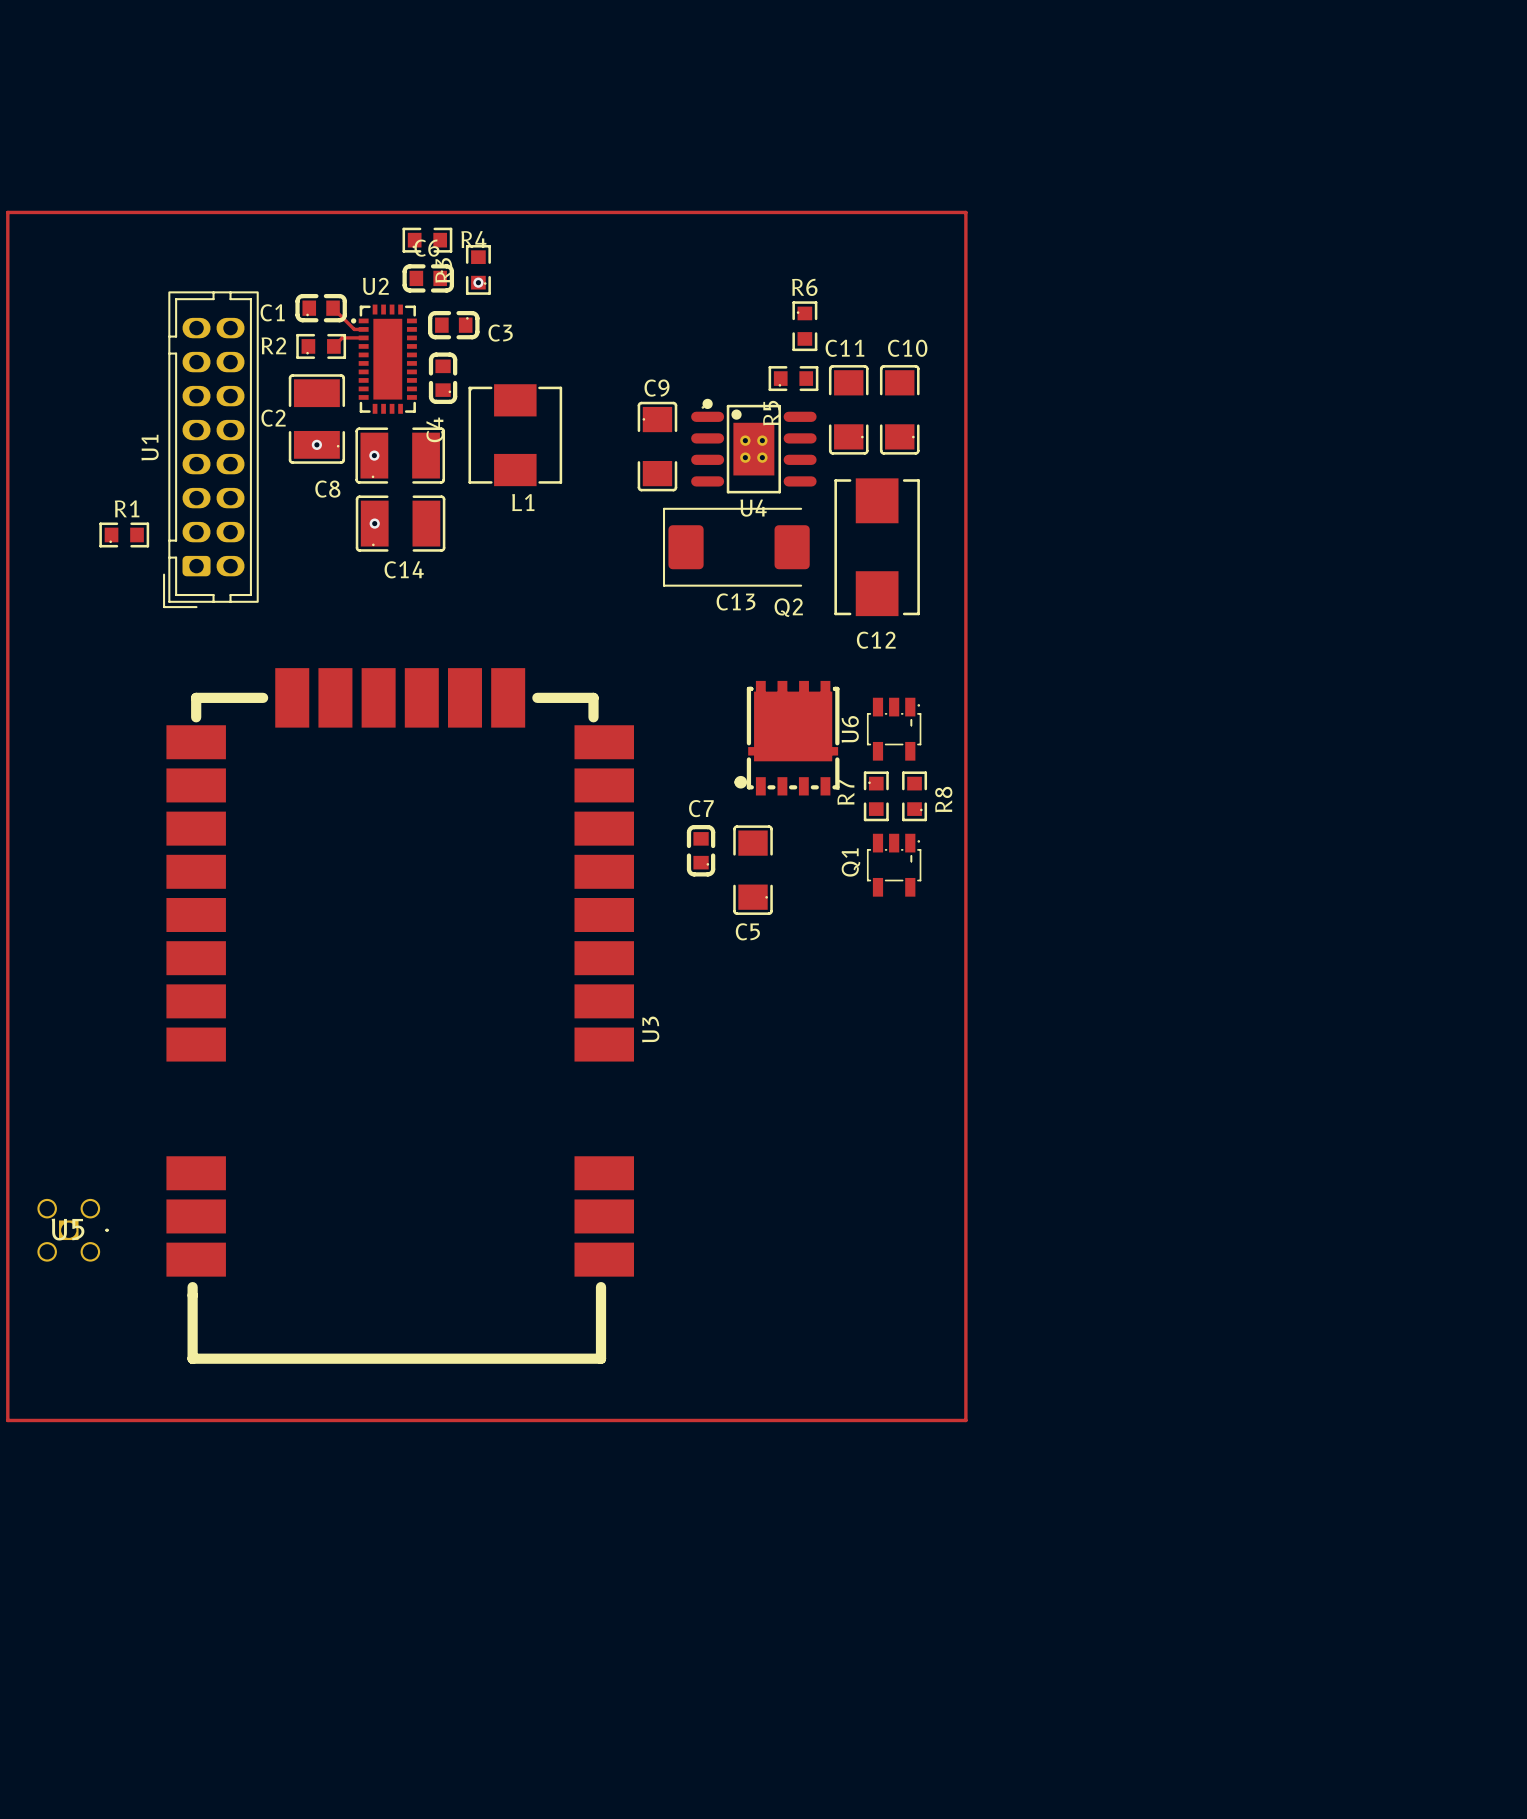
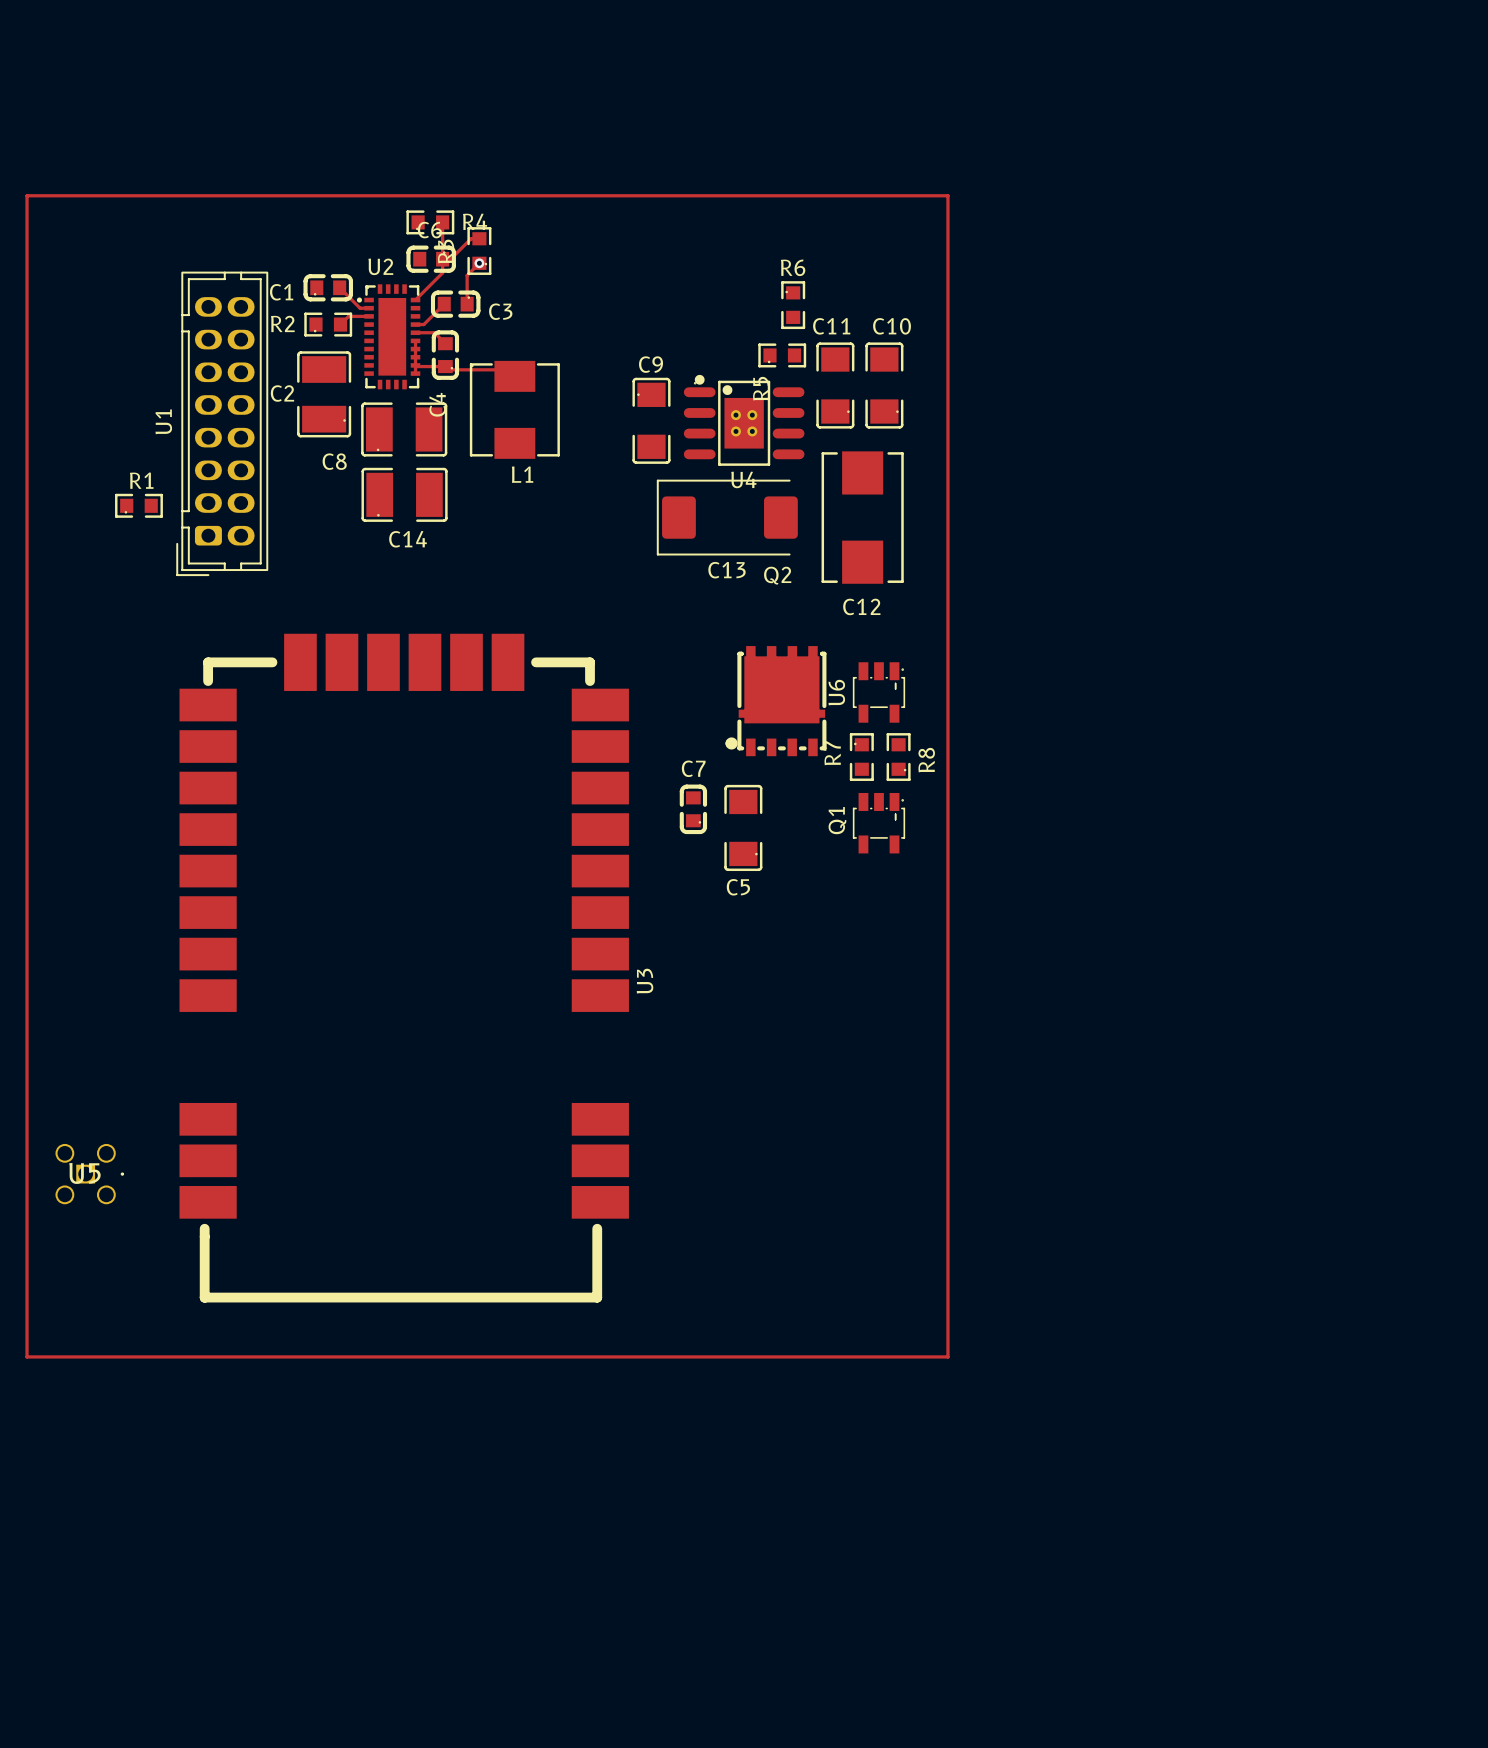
top track: none -> (442, 222) (442, 272) (415, 300)
top track: none -> (479, 238) (471, 238) (450, 259) (442, 259)
top track: none -> (479, 263) (467, 275) (467, 304)
top track: none -> (444, 304) (423, 324) (415, 324)
top track: none -> (415, 332) (434, 332) (445, 343)
top track: none -> (415, 340) (415, 373)
top track: none -> (415, 365) (445, 366) (448, 369) (508, 369) (514, 376)
via: (316, 444) -> none
via: (374, 455) -> none
via: (374, 523) -> none

